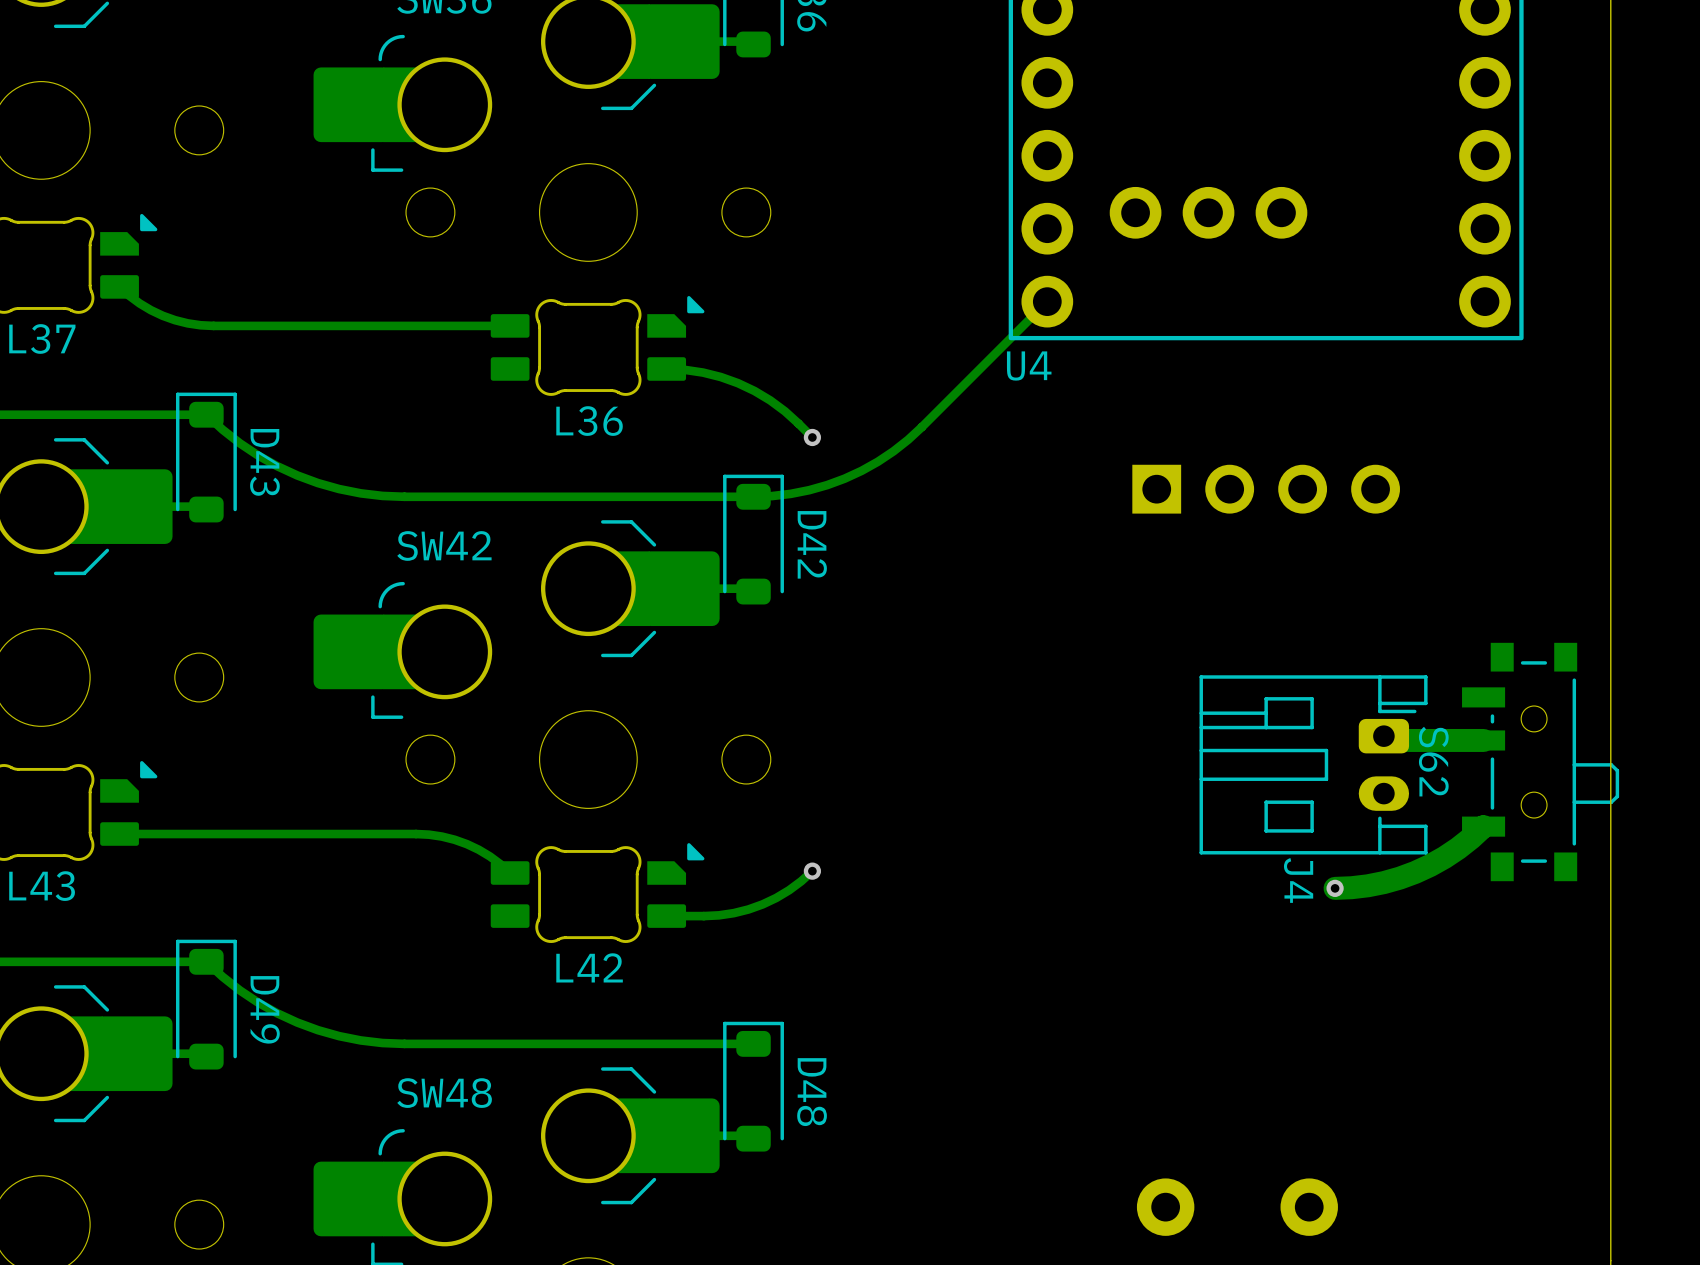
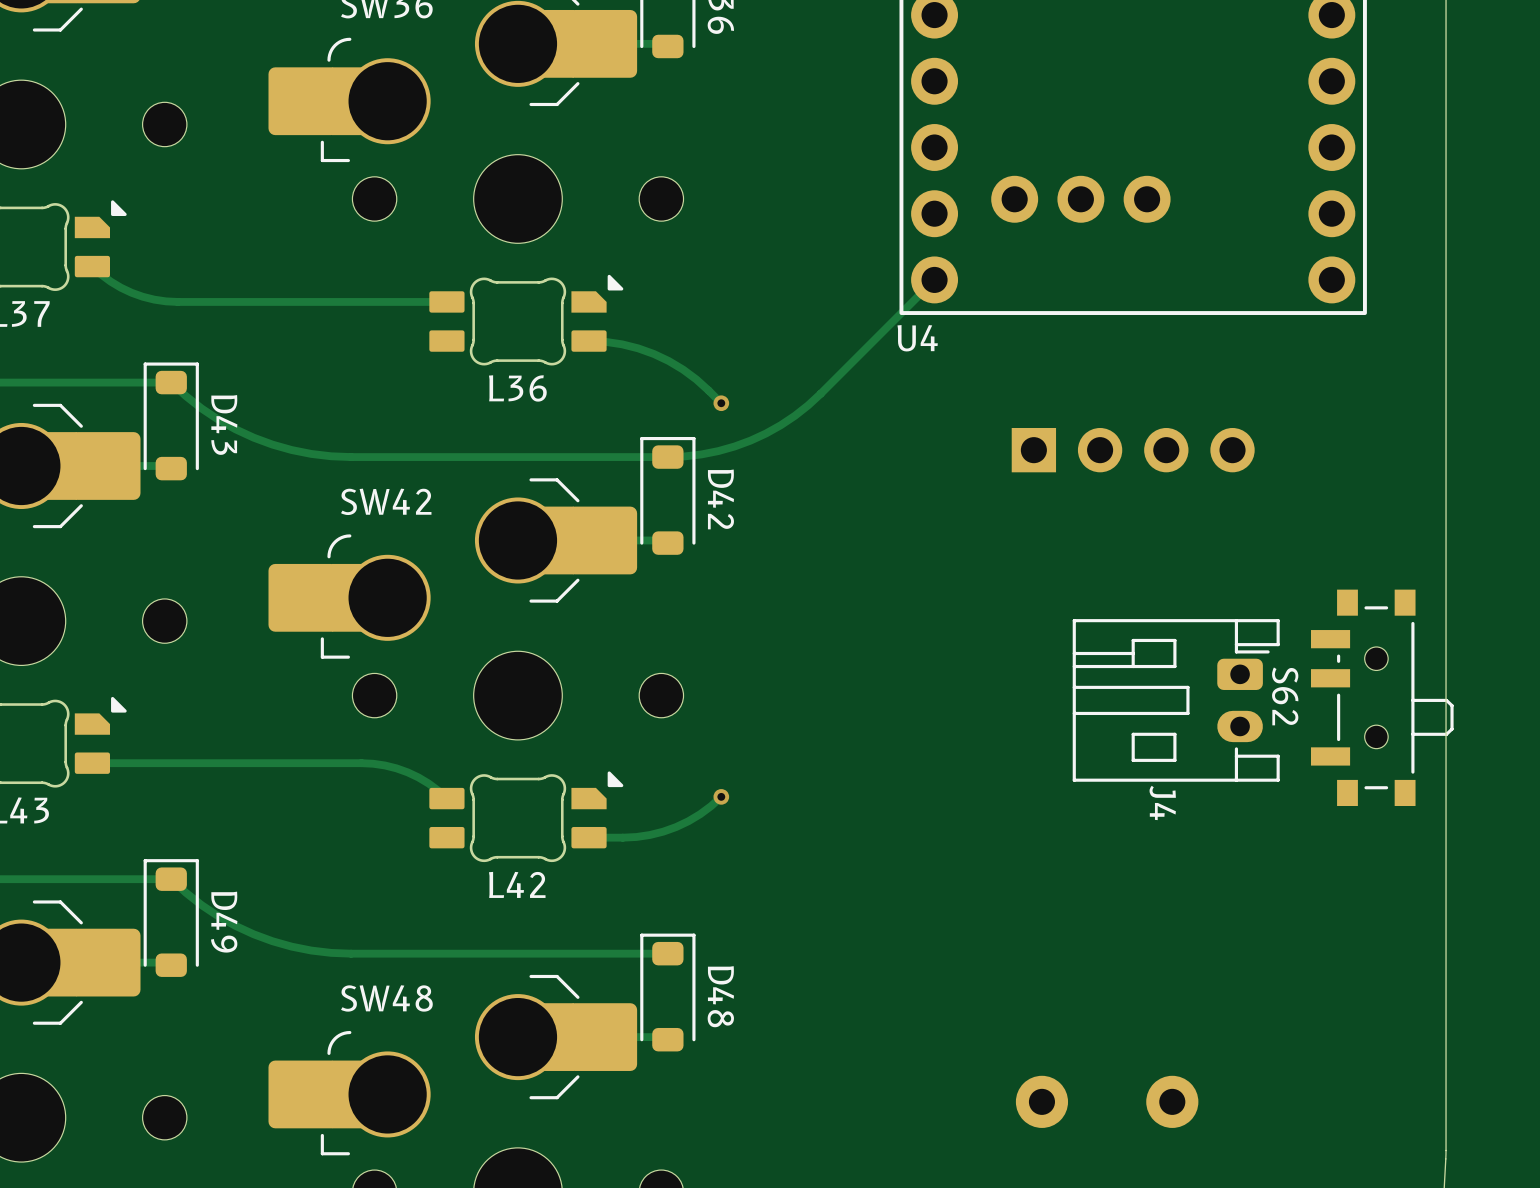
track: (1383, 736) (1388, 740) (1483, 740) -> none
track: (1483, 826) (1458, 848) (1415, 872) (1367, 885) (1335, 888) -> none
via: (1335, 888) -> none

